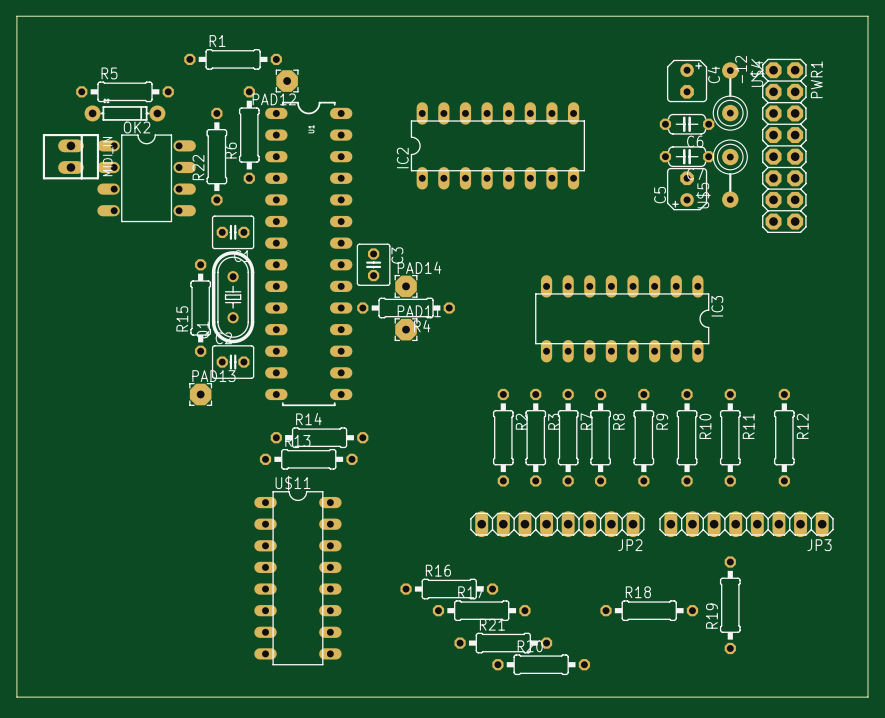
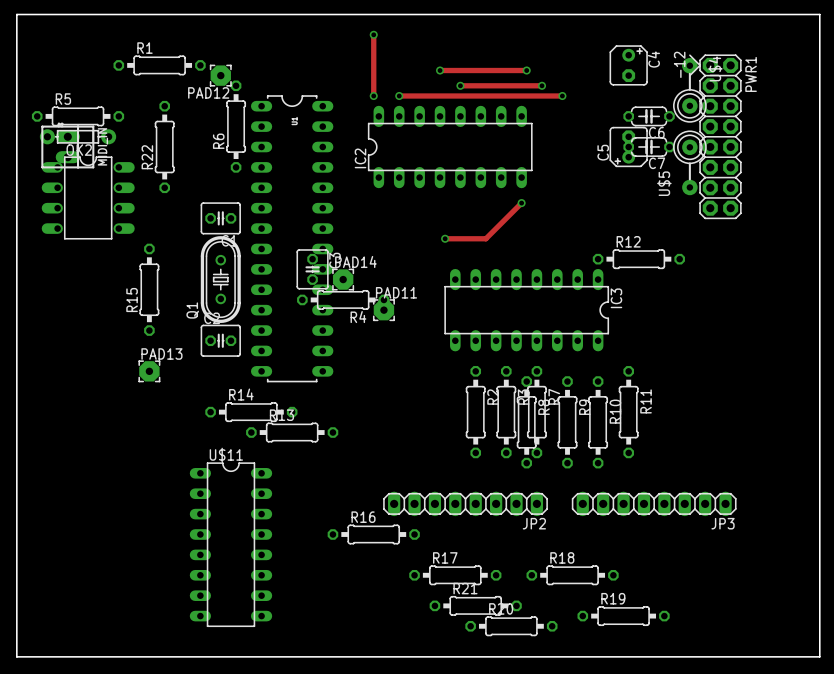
track: none -> (373, 34) (373, 96)
via: none -> (373, 34)
R1 position: (233, 59) -> (159, 65)
track: none -> (440, 70) (526, 70)
via: none -> (440, 70)
via: none -> (526, 70)
PAD12 position: (287, 81) -> (220, 75)
C4 position: (687, 81) -> (628, 65)
R5 position: (125, 91) -> (78, 116)
track: none -> (460, 85) (542, 85)
via: none -> (460, 85)
via: none -> (542, 85)
via: none -> (373, 96)
track: none -> (399, 96) (562, 96)
via: none -> (399, 96)
via: none -> (562, 96)
part position: (125, 113) -> (78, 136)
IC2 position: (497, 145) -> (450, 146)
PWR1 position: (778, 145) -> (715, 136)
R22 position: (216, 156) -> (164, 146)
OK2 position: (146, 178) -> (88, 197)
C5 position: (687, 189) -> (628, 146)
track: none -> (521, 203) (485, 238) (445, 238)
via: none -> (521, 203)
via: none -> (445, 238)
C3 position: (373, 264) -> (312, 269)
PAD14 position: (406, 286) -> (343, 279)
R15 position: (200, 308) -> (149, 289)
R4 position: (406, 308) -> (343, 299)
IC3 position: (622, 318) -> (526, 310)
PAD13 position: (200, 394) -> (149, 371)
R12 name position: R12 (802, 426) -> R12 (628, 241)
R14 position: (319, 437) -> (251, 412)
R8 position: (600, 437) -> (526, 422)
R9 position: (643, 437) -> (567, 422)
R10 position: (687, 437) -> (598, 422)
R11 position: (730, 437) -> (628, 412)
R12 rotation: 0° (784, 437) -> 90° clockwise (638, 259)
R12 position: (784, 437) -> (638, 259)
JP2 position: (557, 524) -> (465, 503)
JP3 position: (746, 524) -> (654, 503)
U$11 position: (297, 578) -> (230, 544)
R16 position: (449, 589) -> (373, 534)
R19 rotation: 0° (730, 605) -> 90° clockwise (623, 616)
R19 position: (730, 605) -> (623, 616)
R18 position: (649, 610) -> (572, 575)

